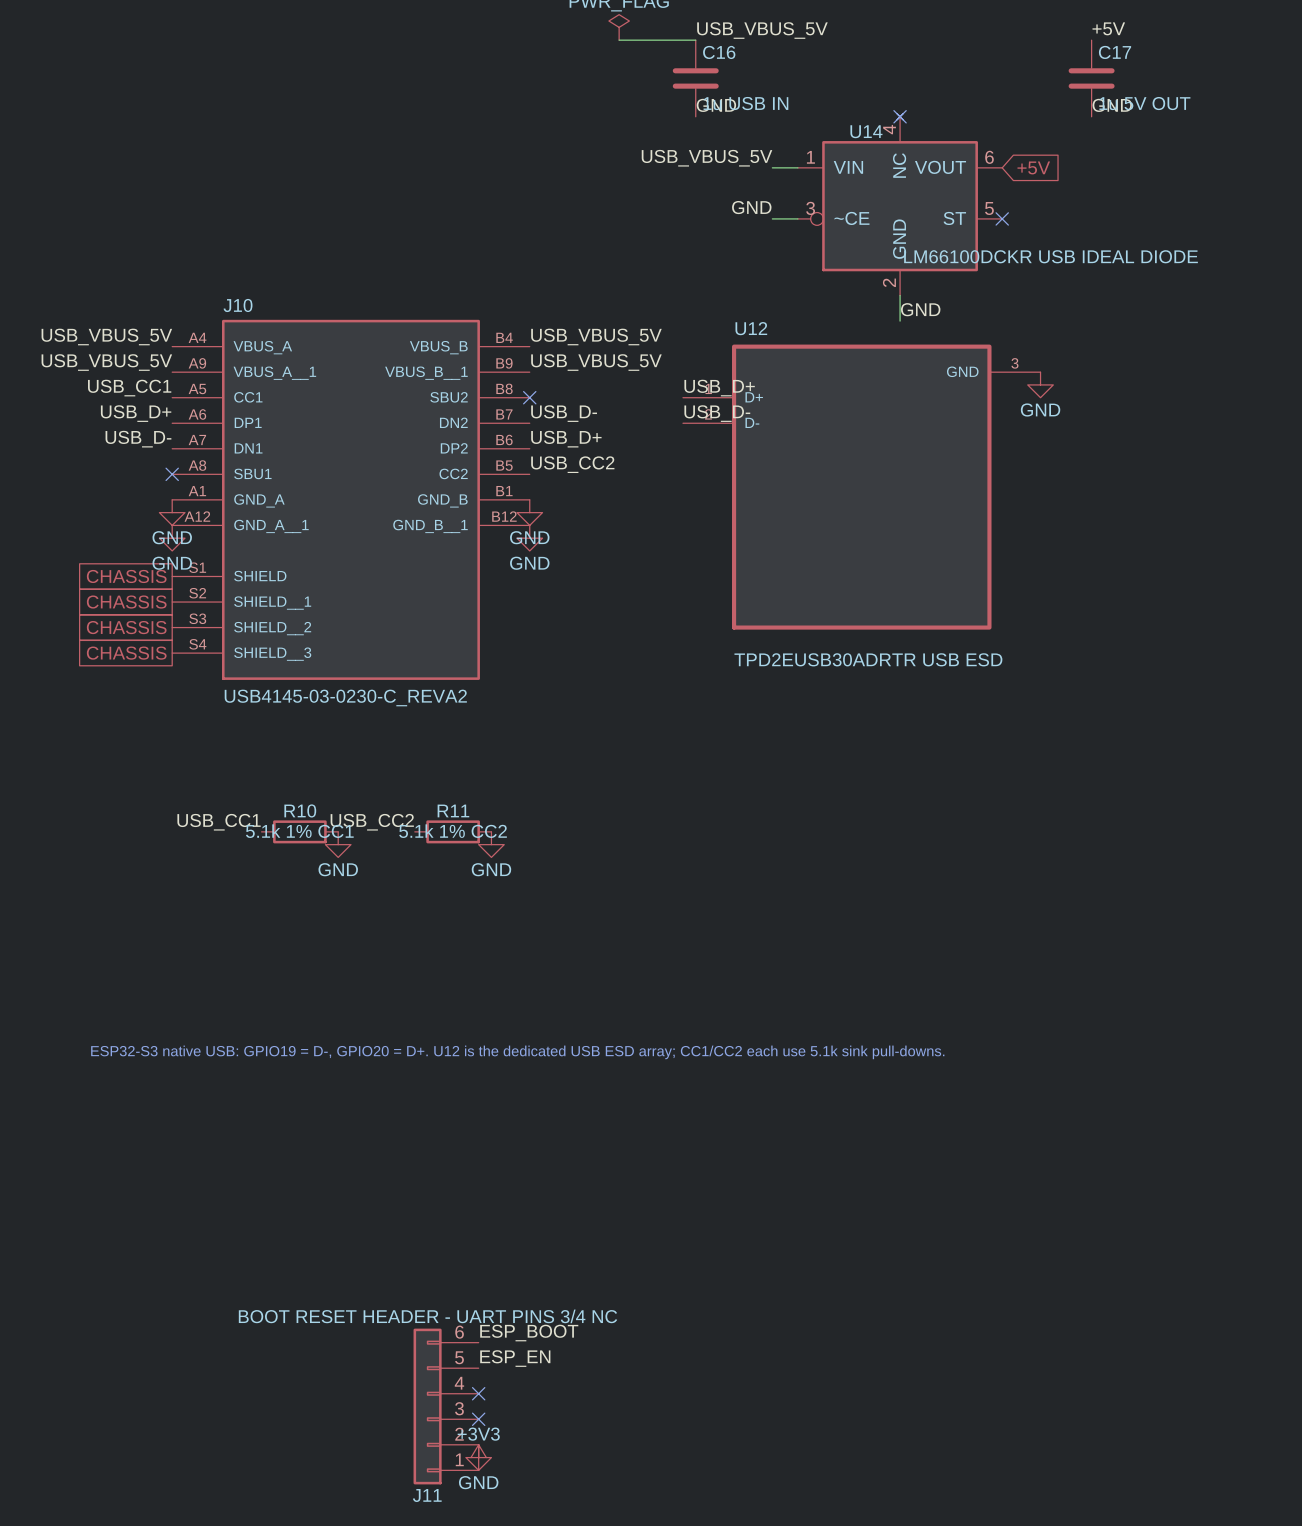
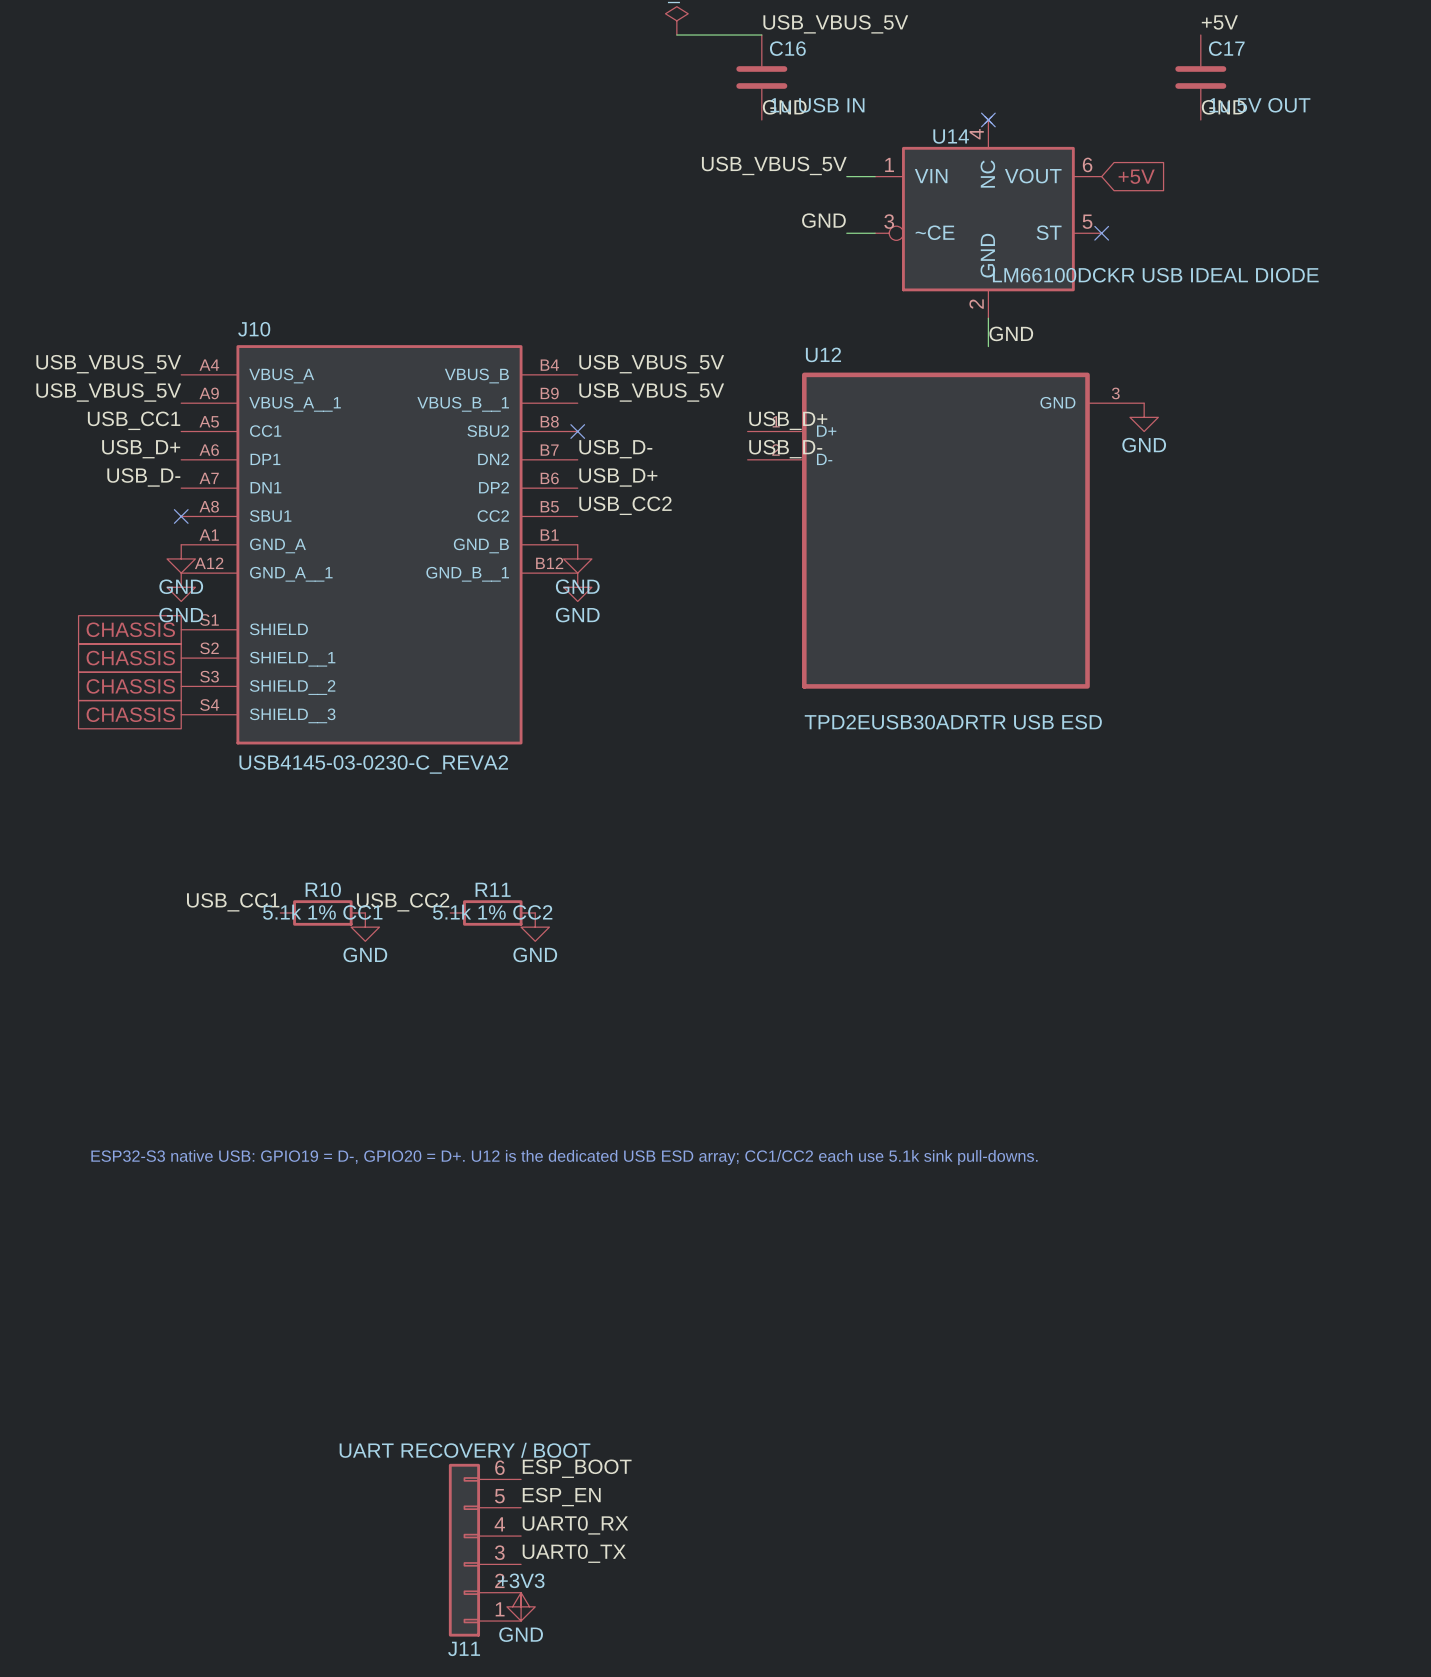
J11 value: BOOT RESET HEADER - UART PINS 3/4 NC (428, 1316) -> UART RECOVERY / BOOT (465, 1450)
label: none -> UART0_RX (575, 1525)
no-connect mark: (478, 1393) -> none
label: none -> UART0_TX (574, 1553)
no-connect mark: (478, 1419) -> none

